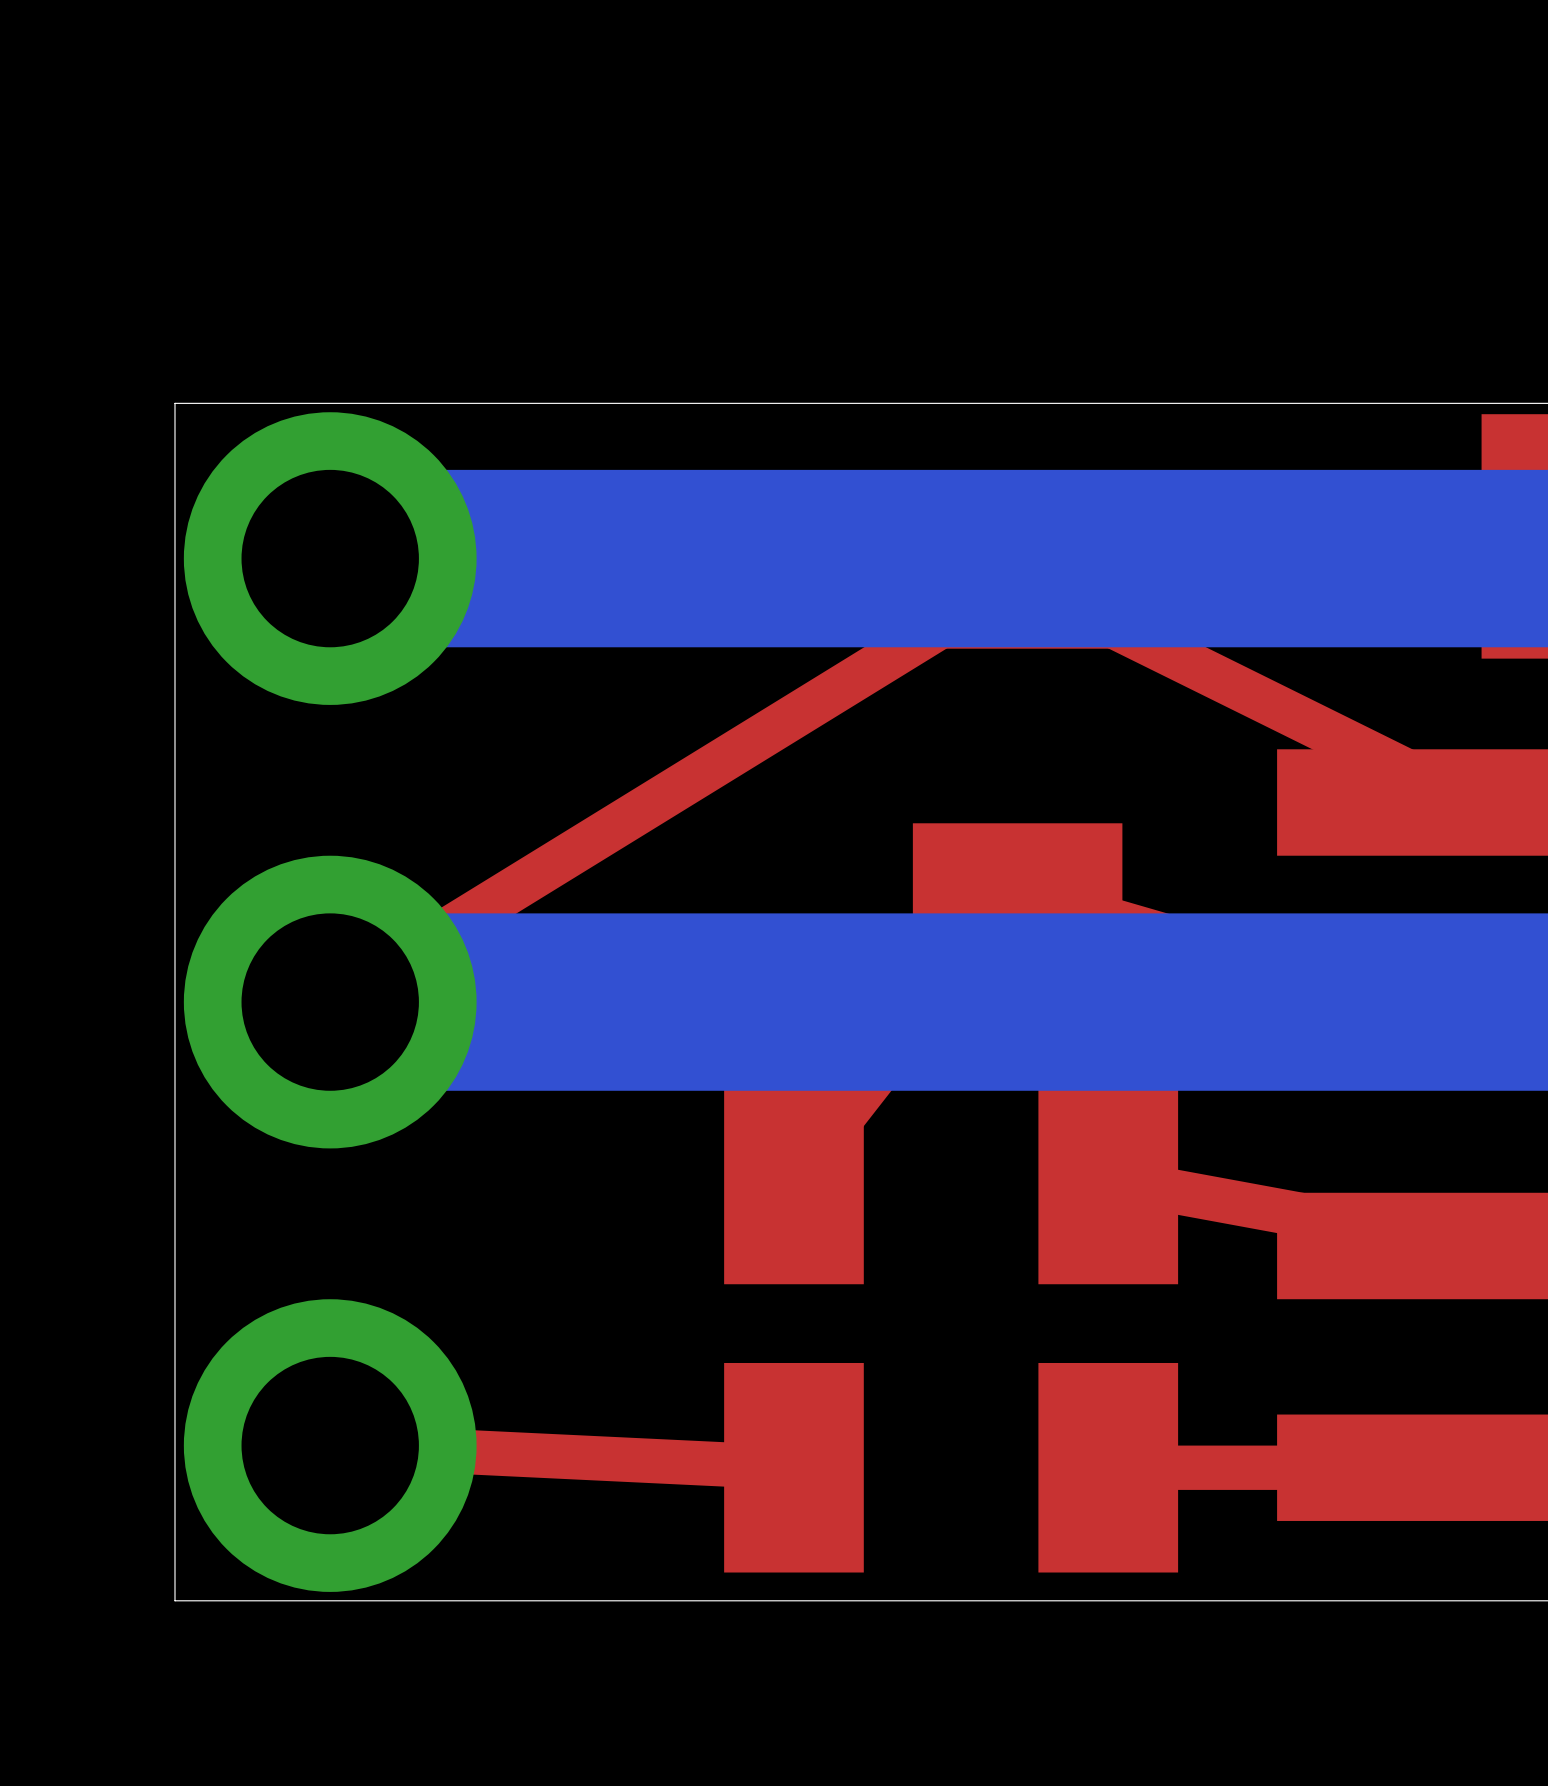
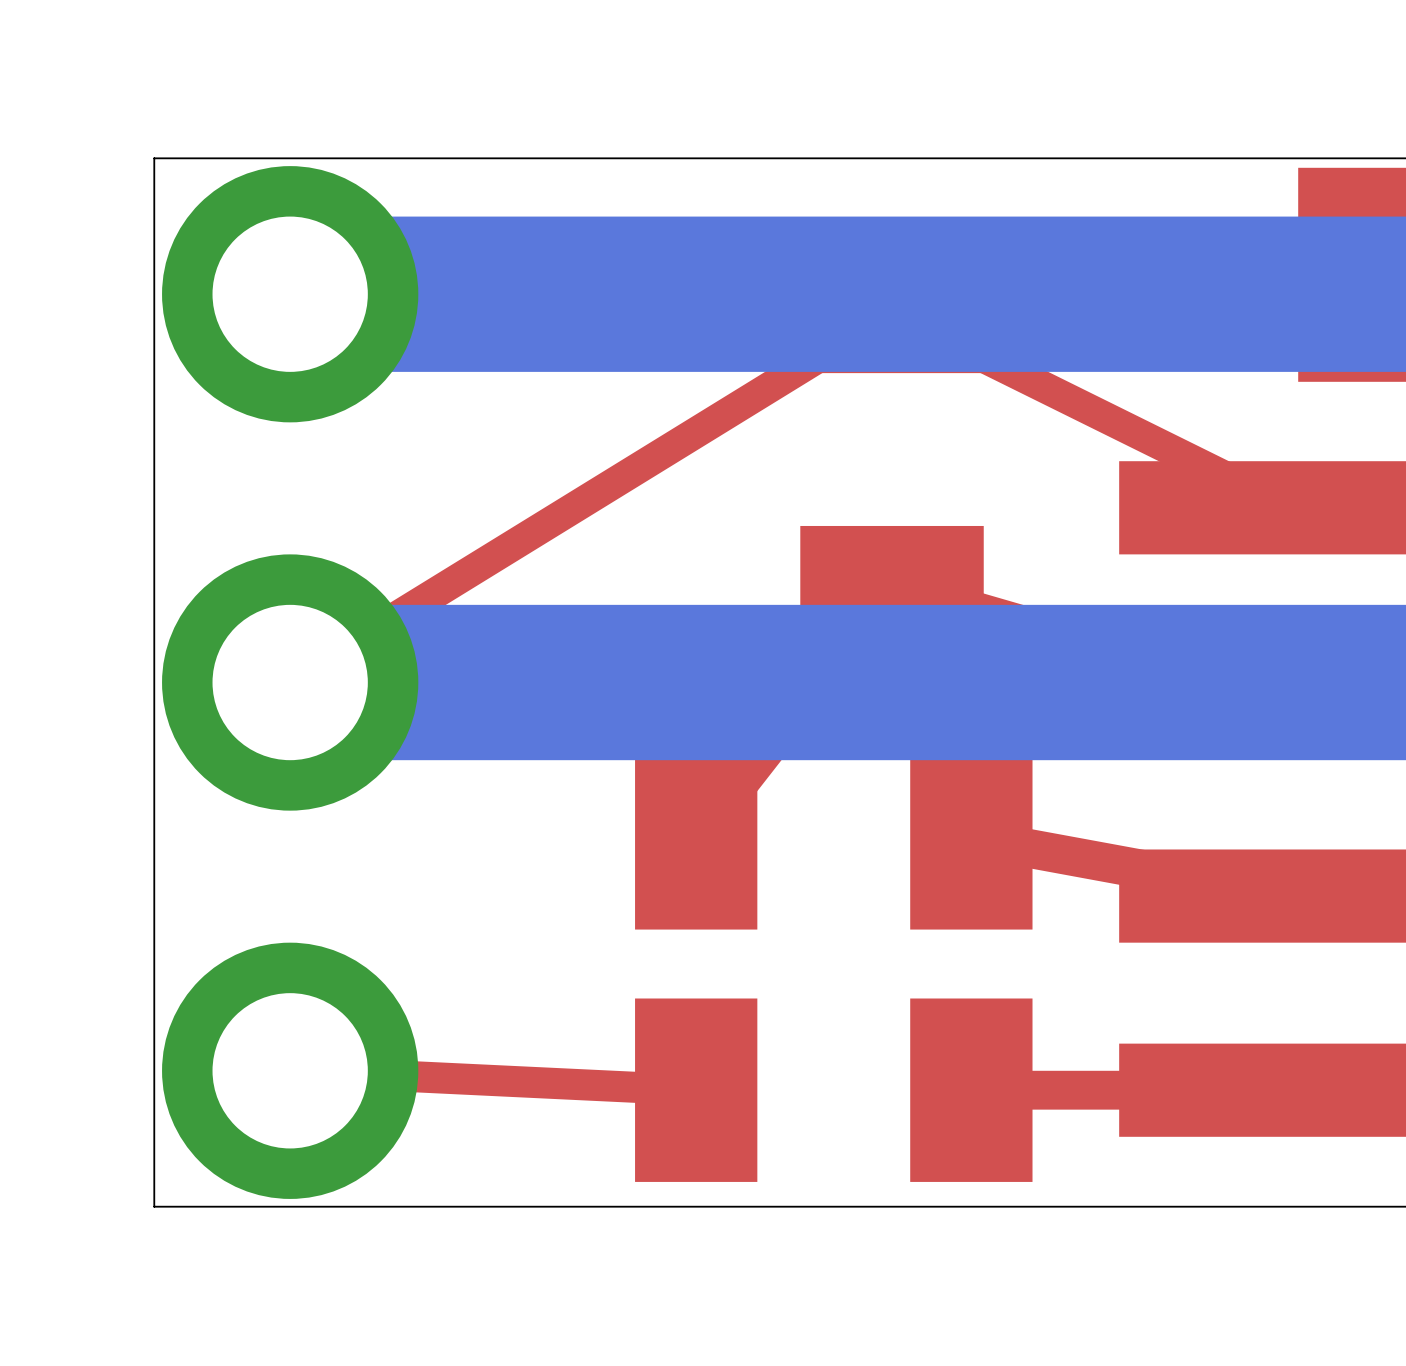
top track width: thick (1470, 802) (1017, 578) (330, 1002) -> thin (1288, 507) (892, 311) (290, 682)
top track width: thick (330, 1445) (793, 1467) -> thin (290, 1070) (696, 1090)

